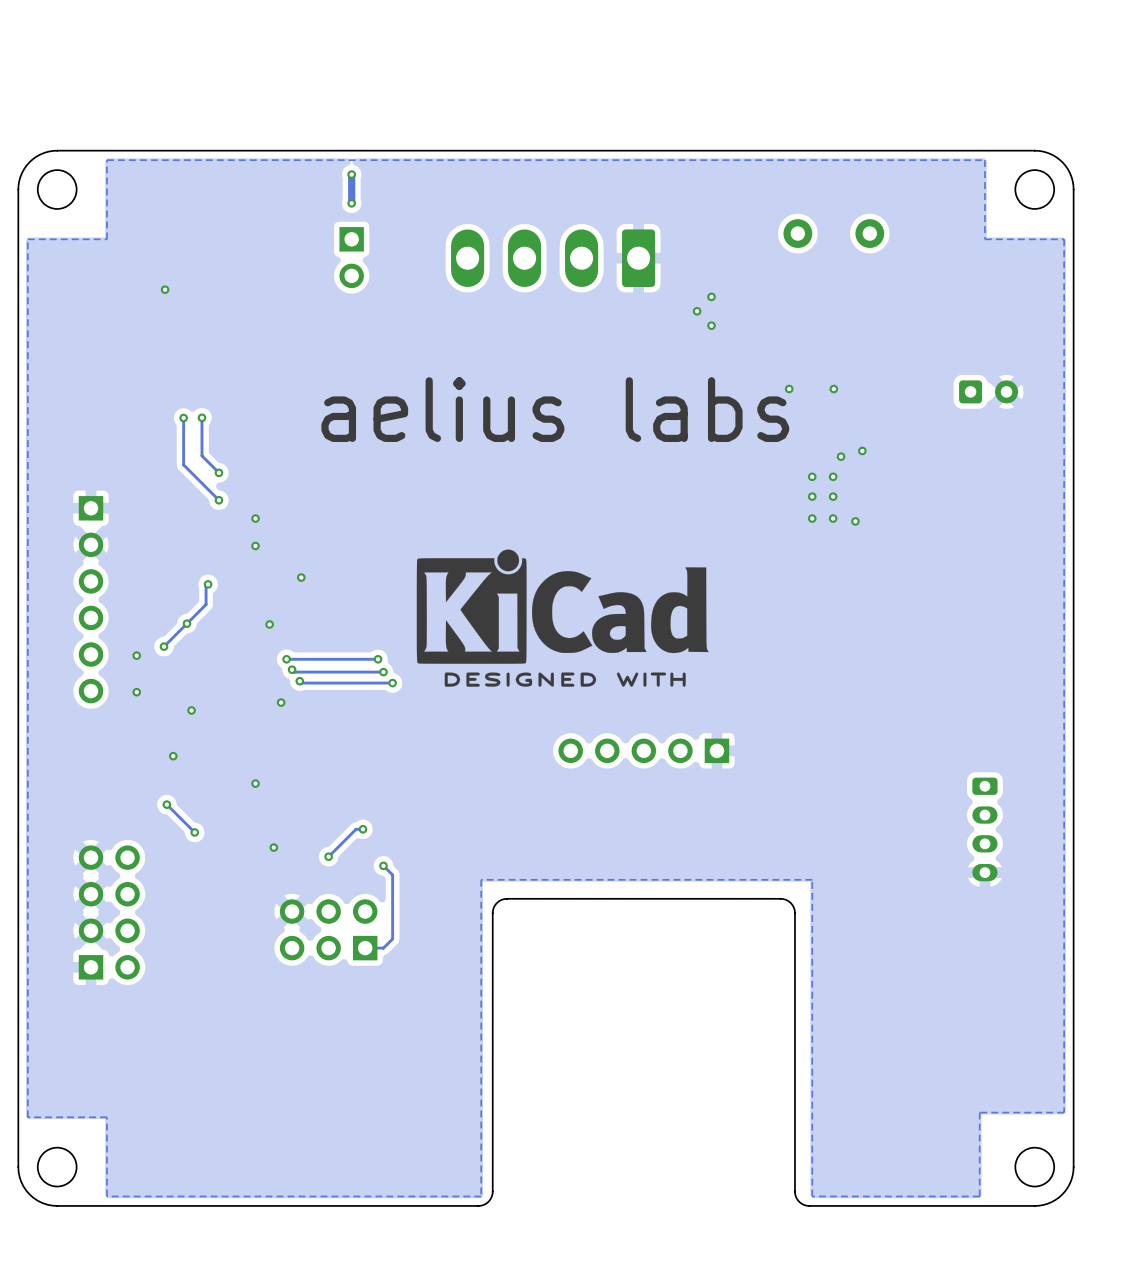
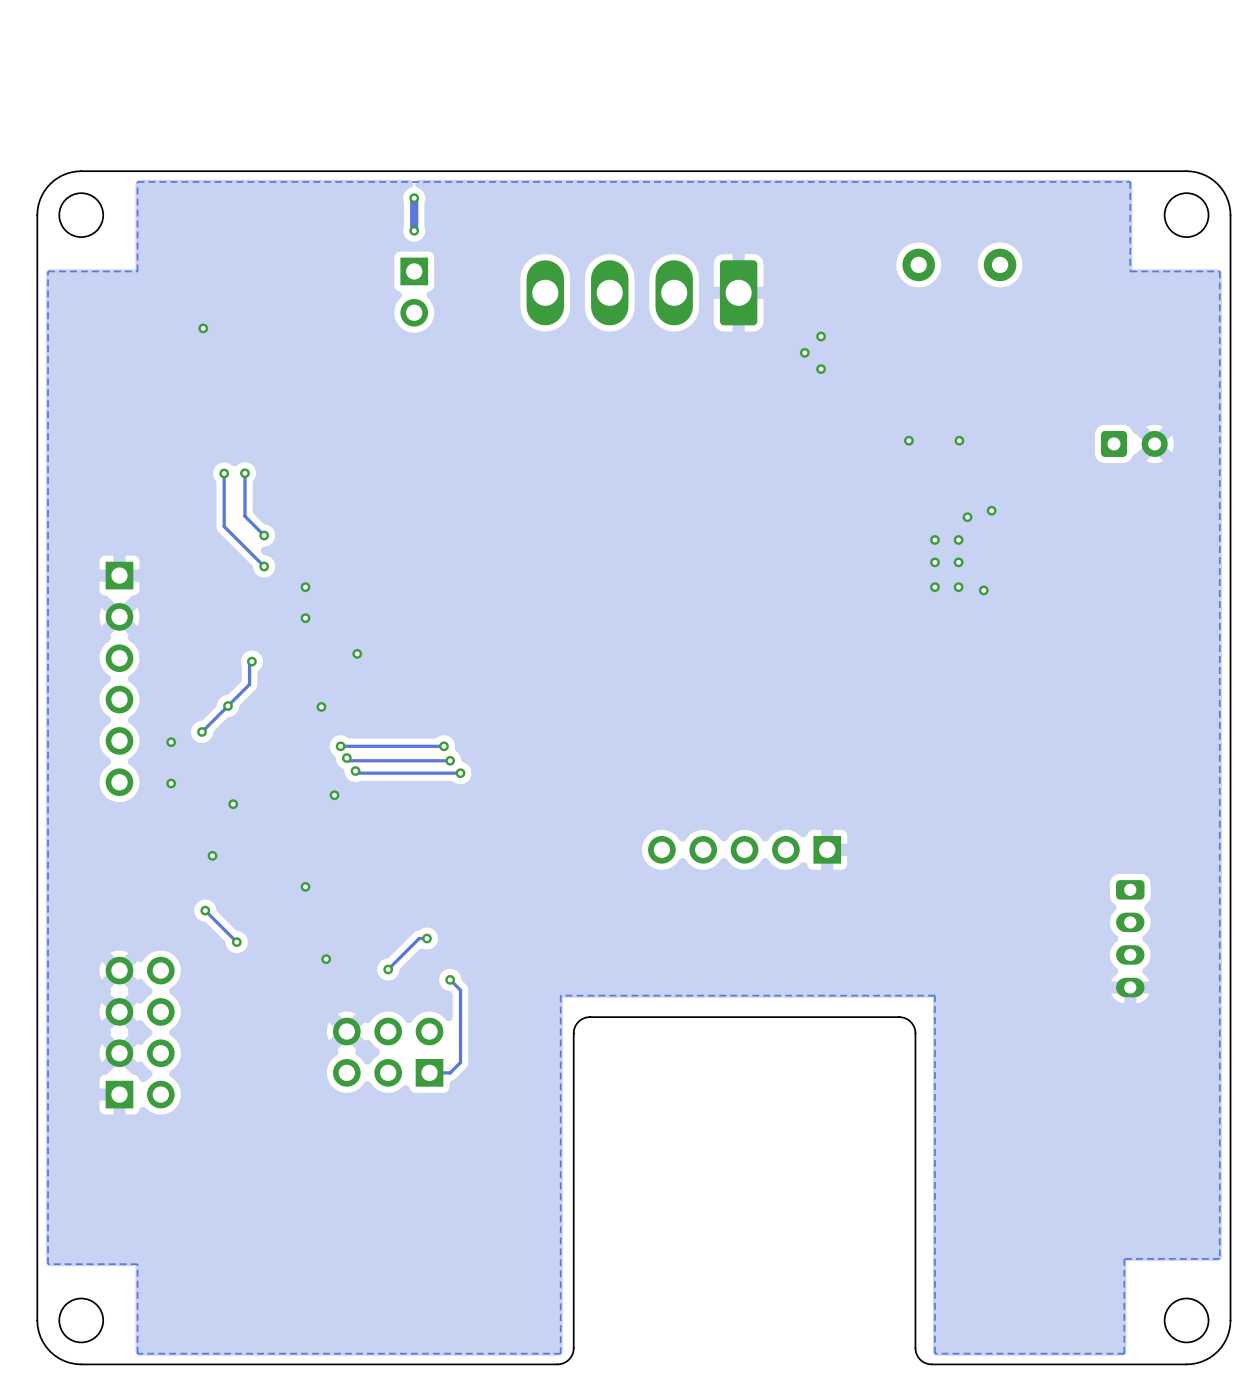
text: aelius labs (555, 409) -> none
drawing: [416, 549, 709, 687] -> none

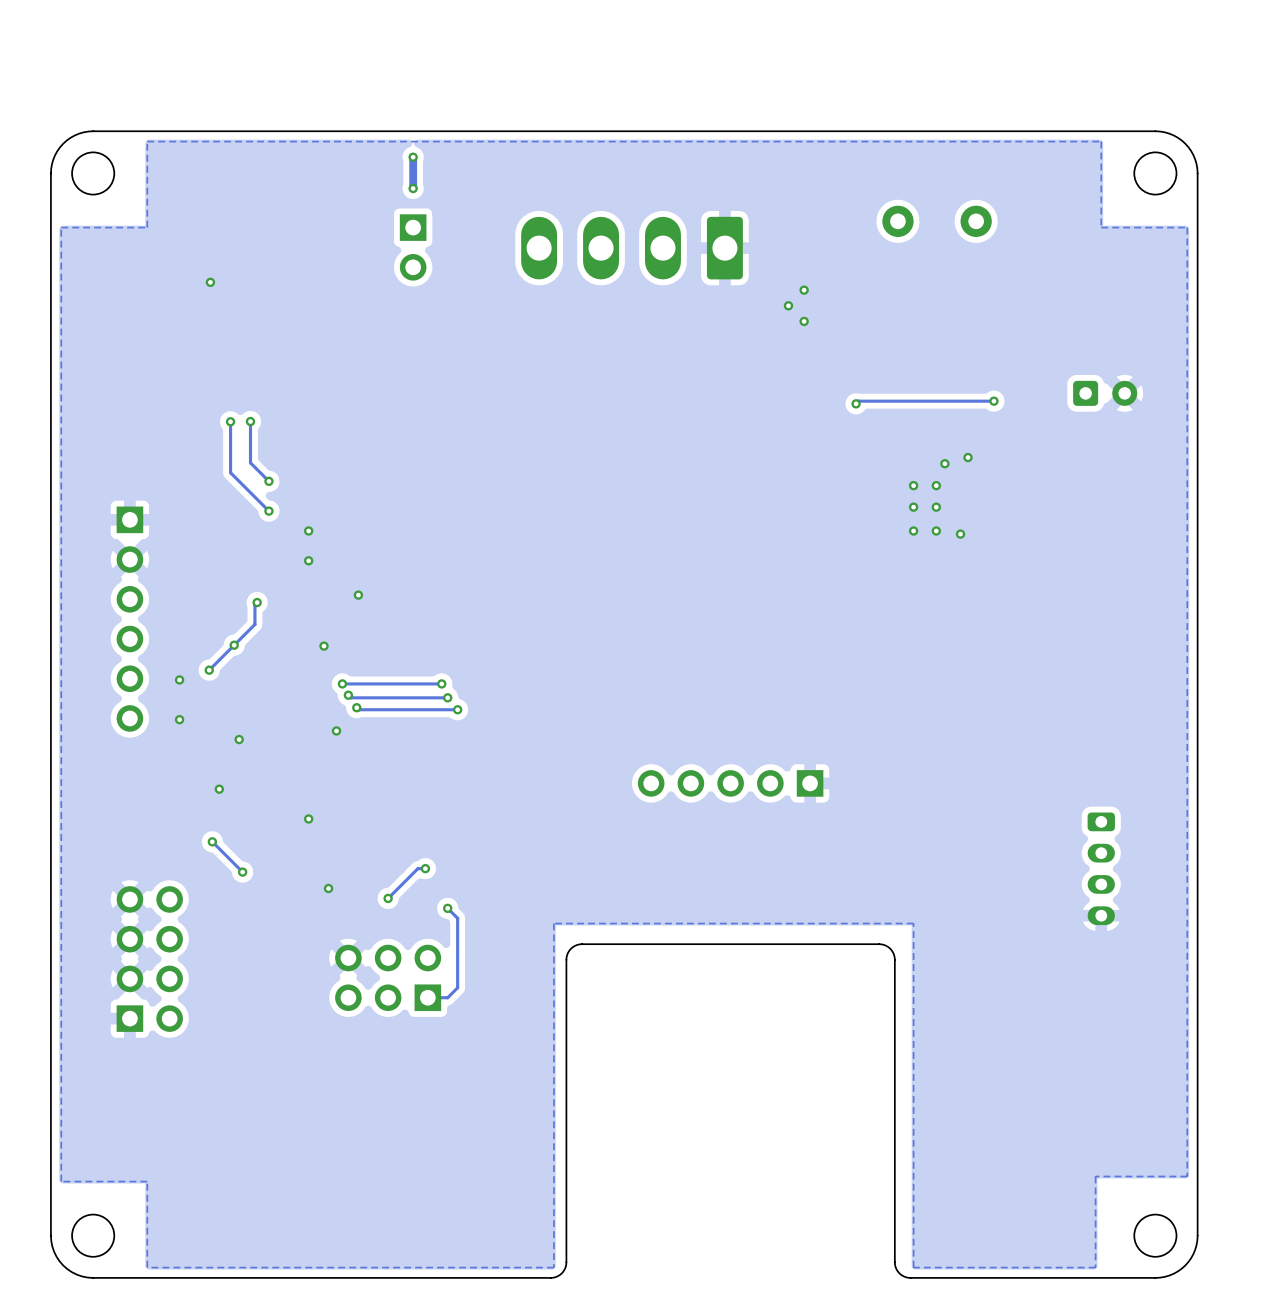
via position: (908, 440) -> (856, 403)
via: (959, 440) -> none
track: none -> (993, 401) (858, 401) (856, 403)
via: none -> (993, 401)

